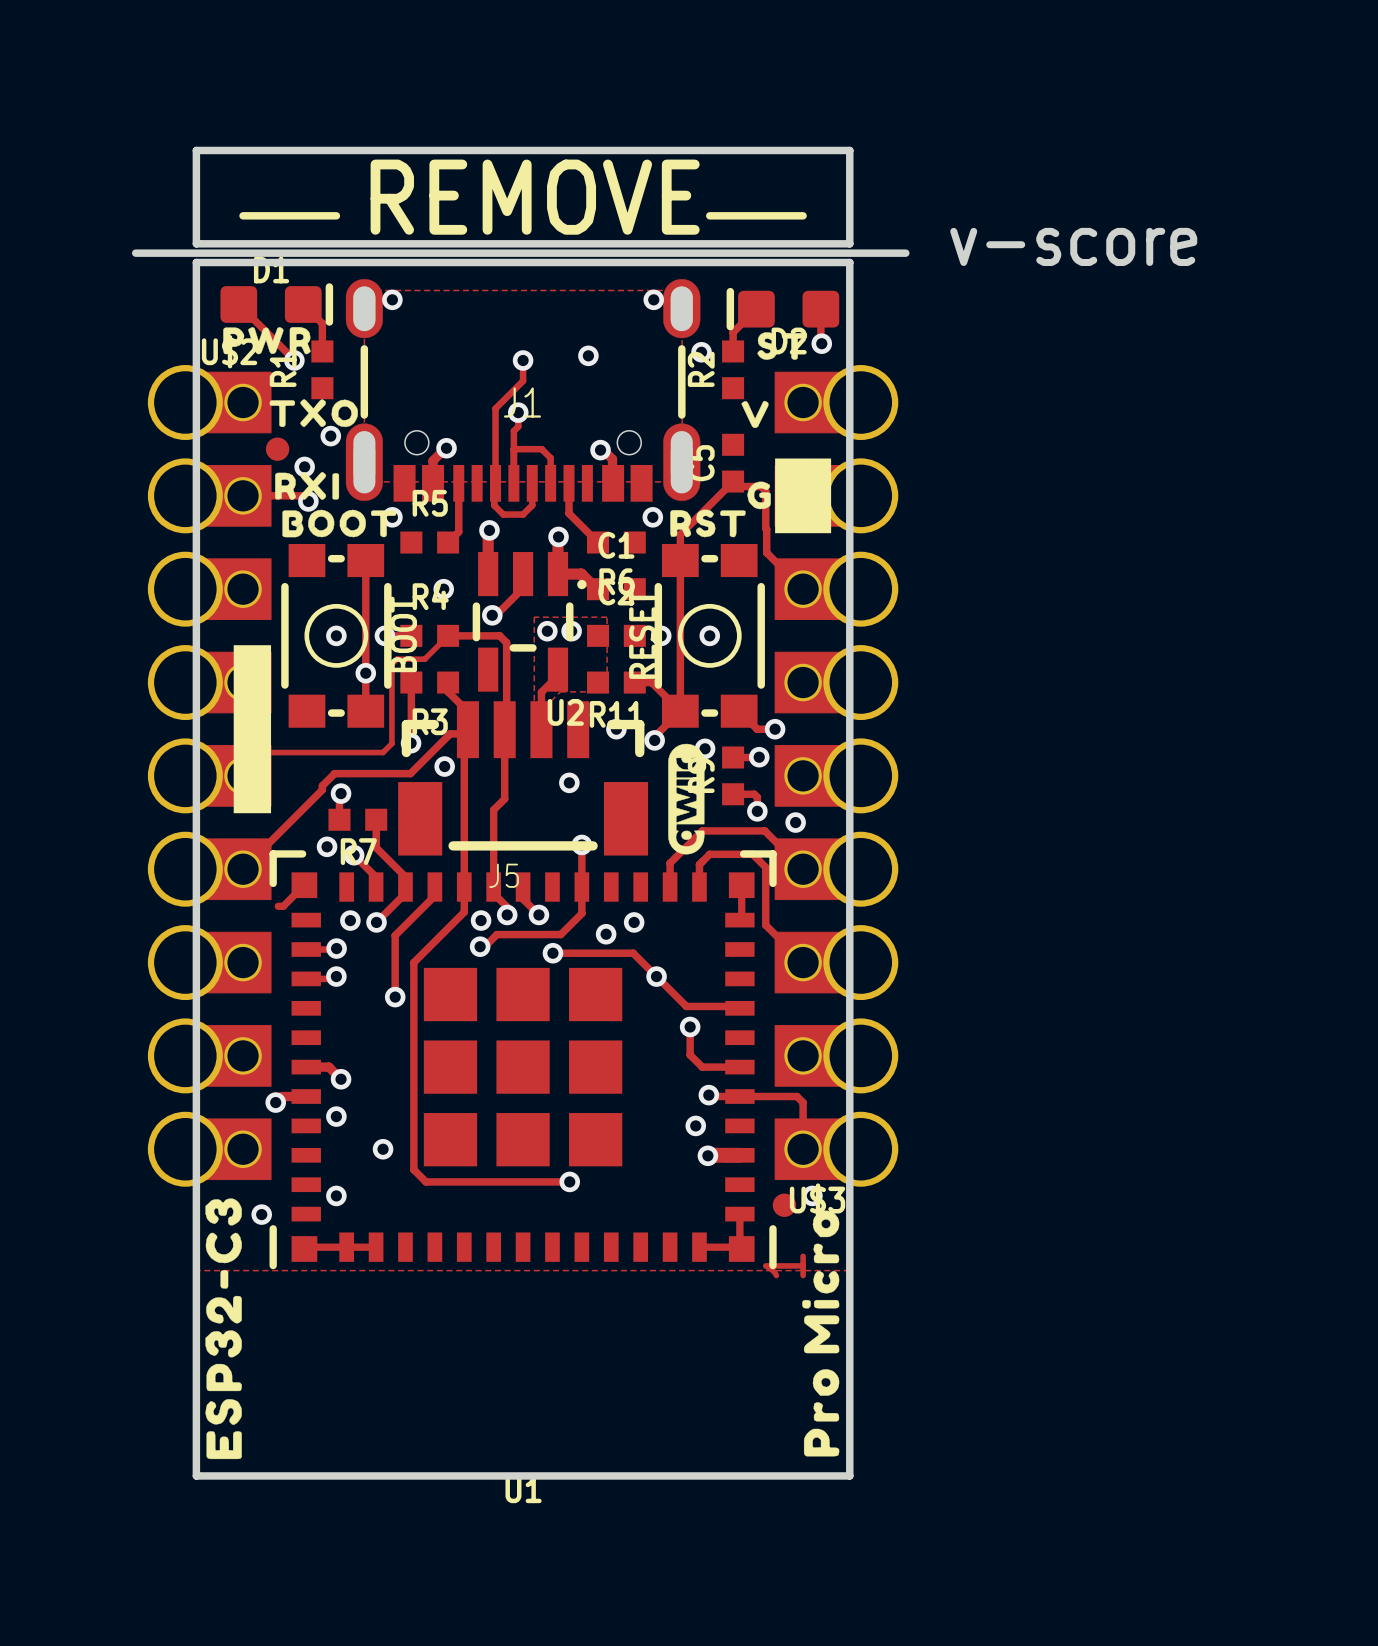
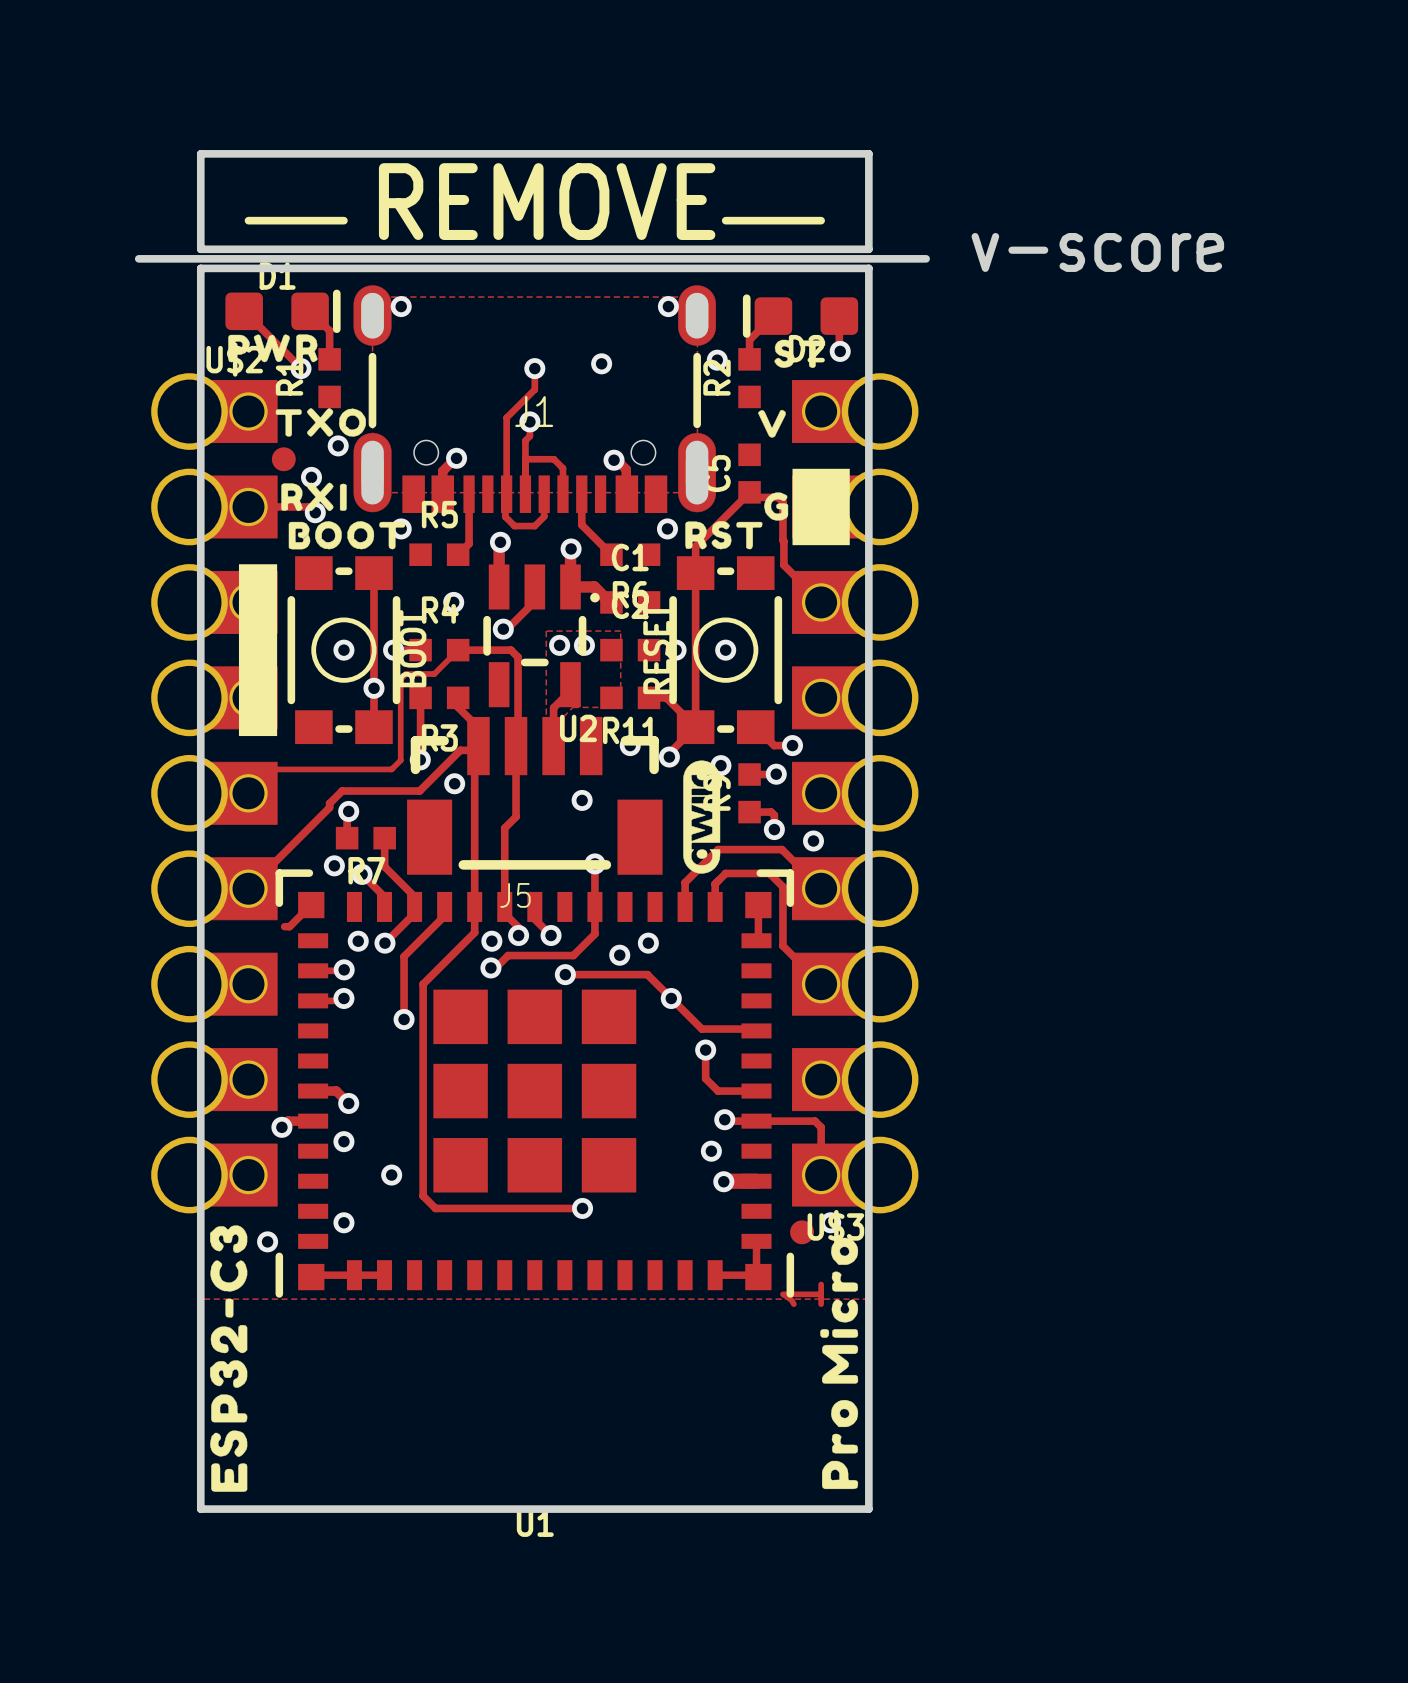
drawing position: (252, 729) -> (258, 650)

